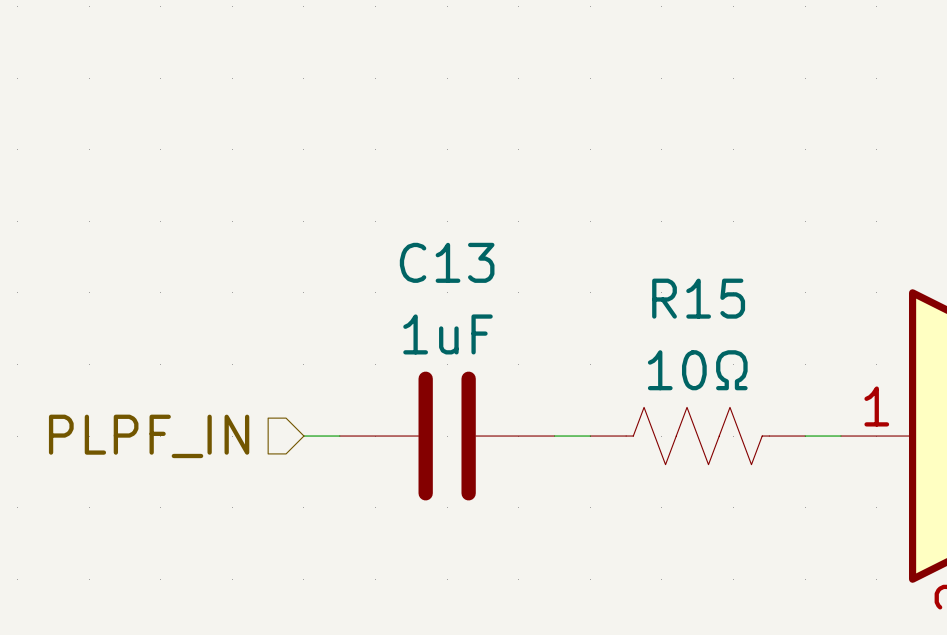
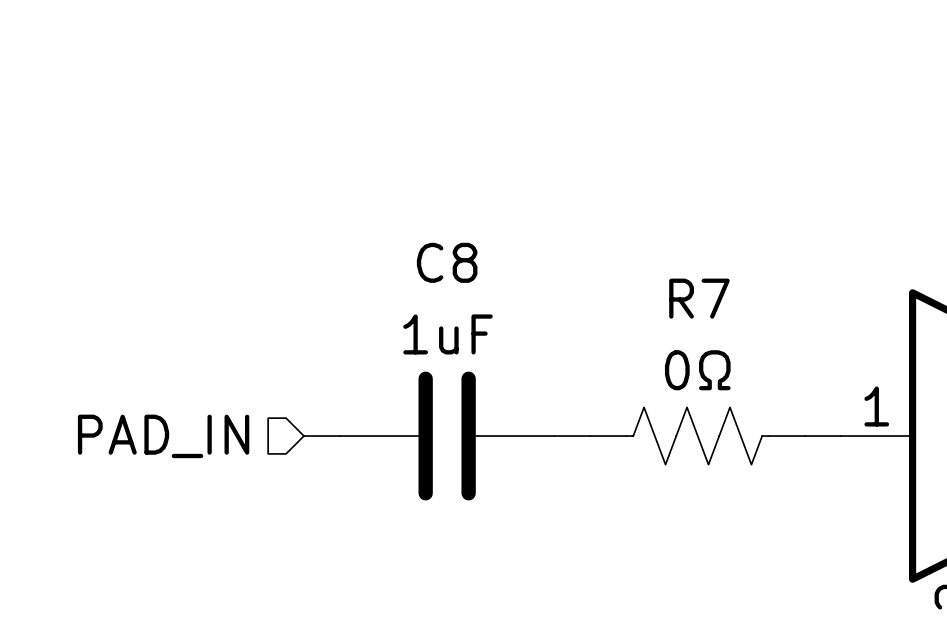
C13 name: C13 (447, 262) -> C8 (447, 262)
R15 name: R15 (698, 298) -> R7 (699, 298)
R15 value: 10Ω (697, 370) -> 0Ω (697, 370)
hierarchical label: PLPF_IN (149, 436) -> PAD_IN (163, 436)

